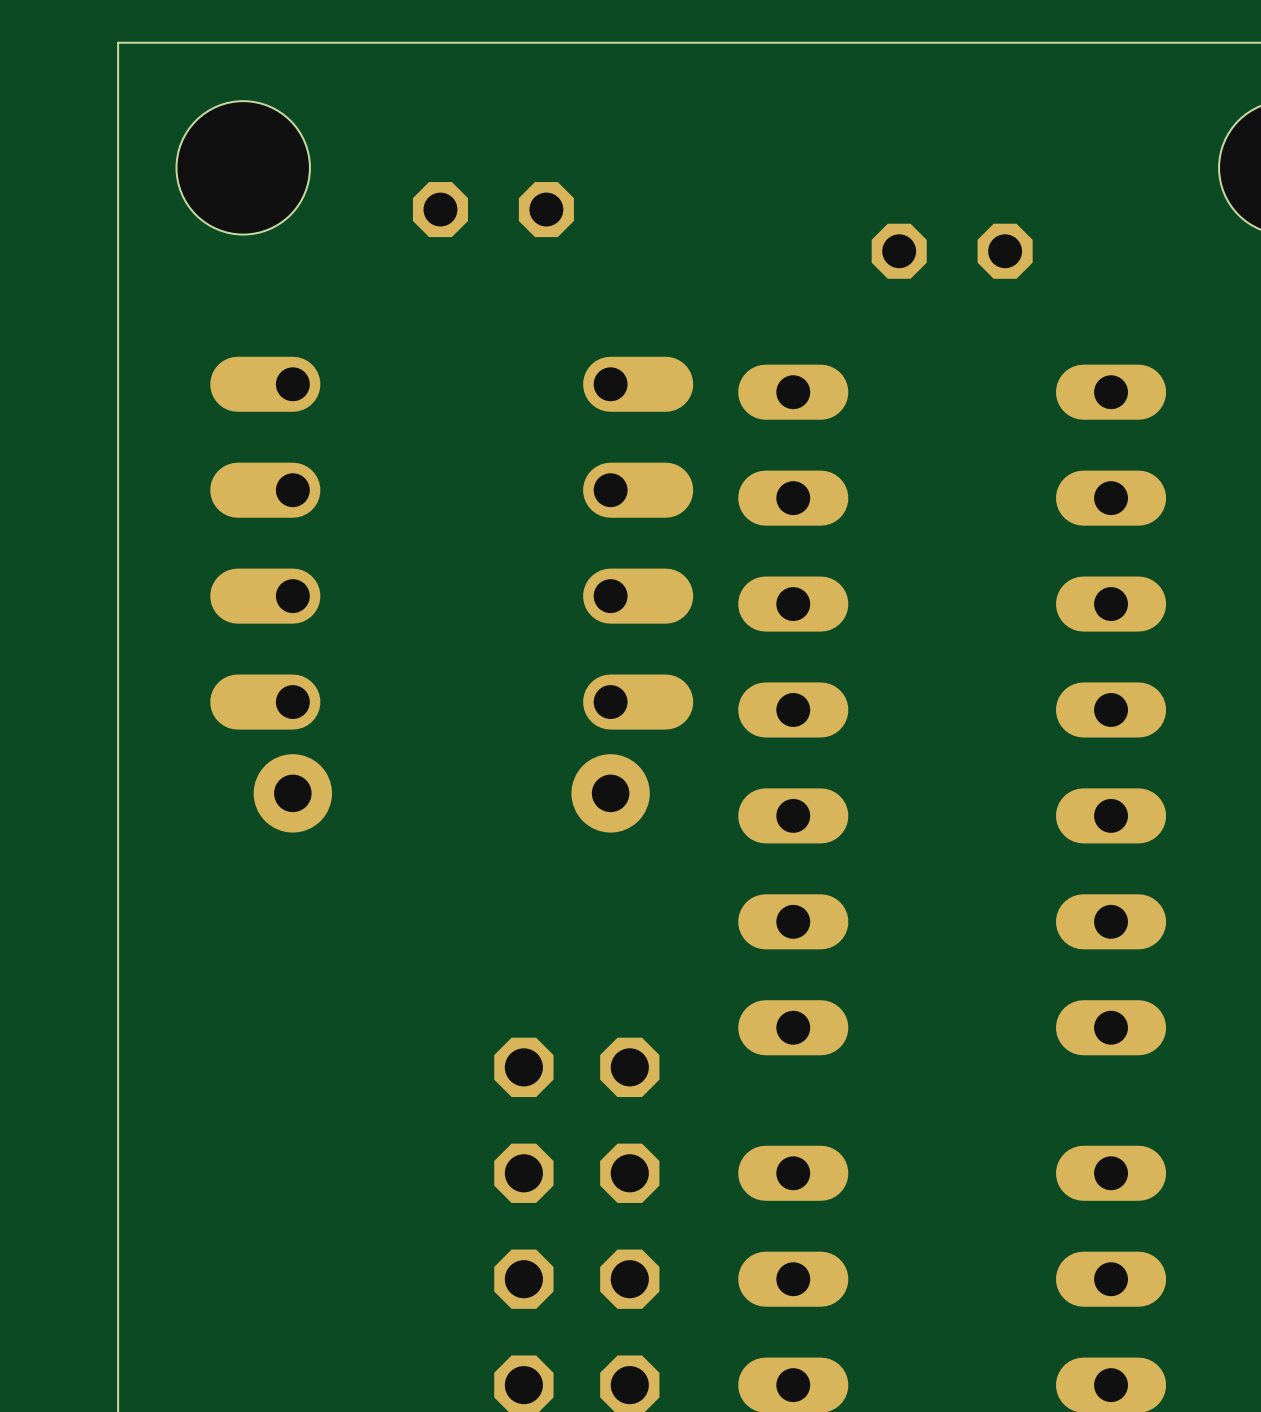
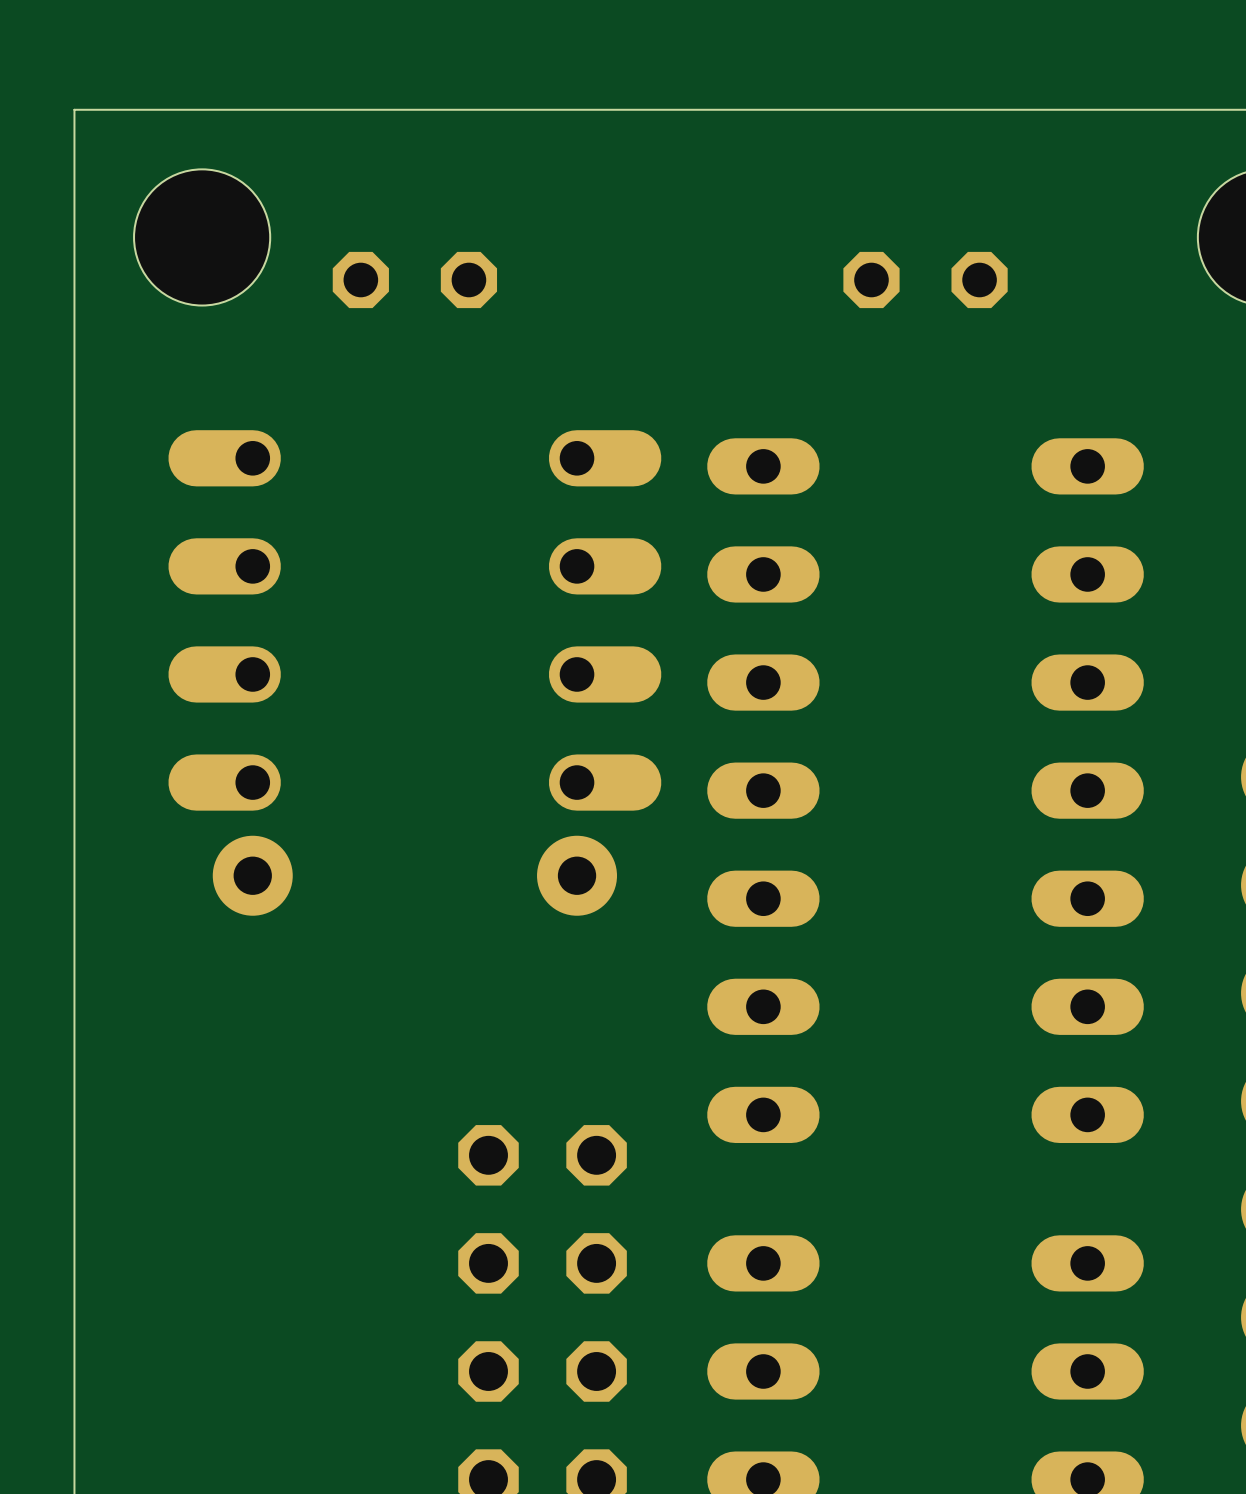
part position: (493, 209) -> (414, 279)
part position: (952, 251) -> (925, 279)

